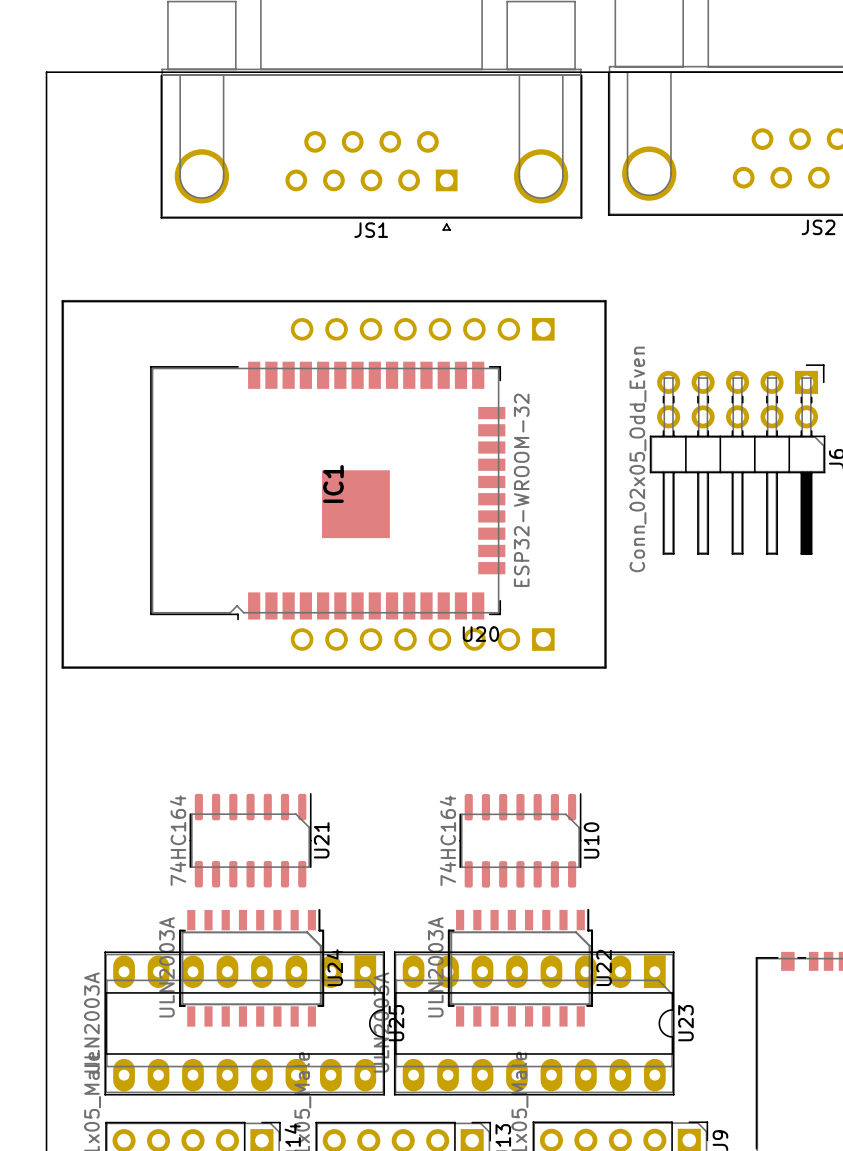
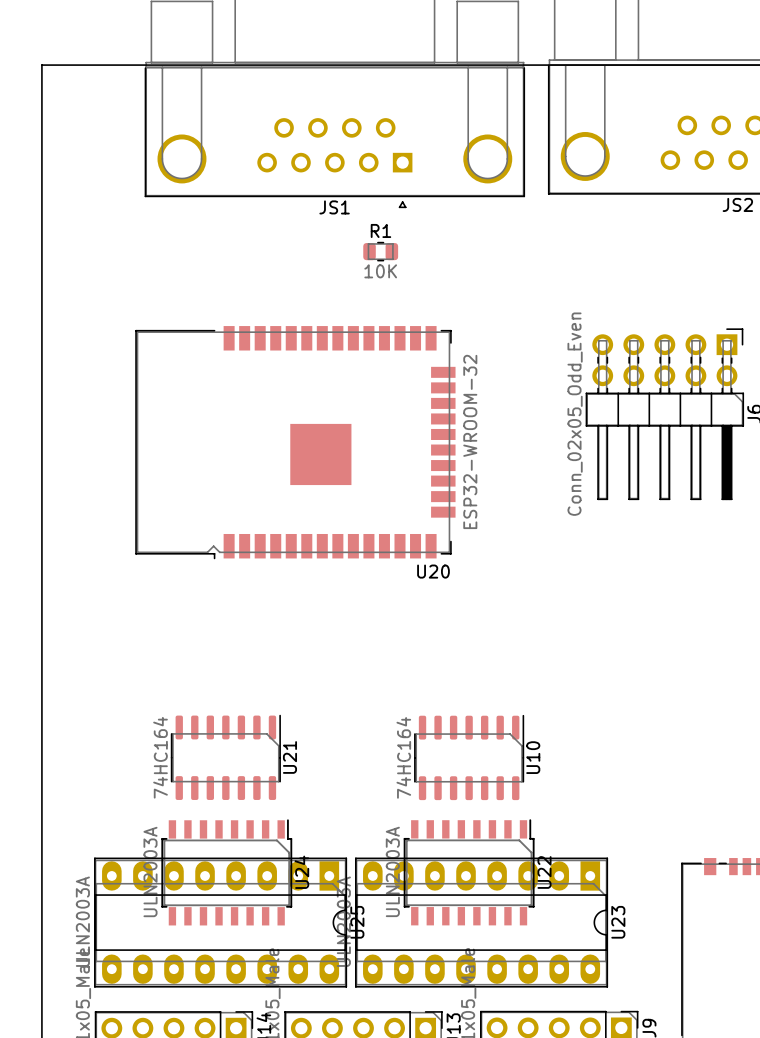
R1: none -> 10K (380, 251)
IC1: (334, 484) -> none

